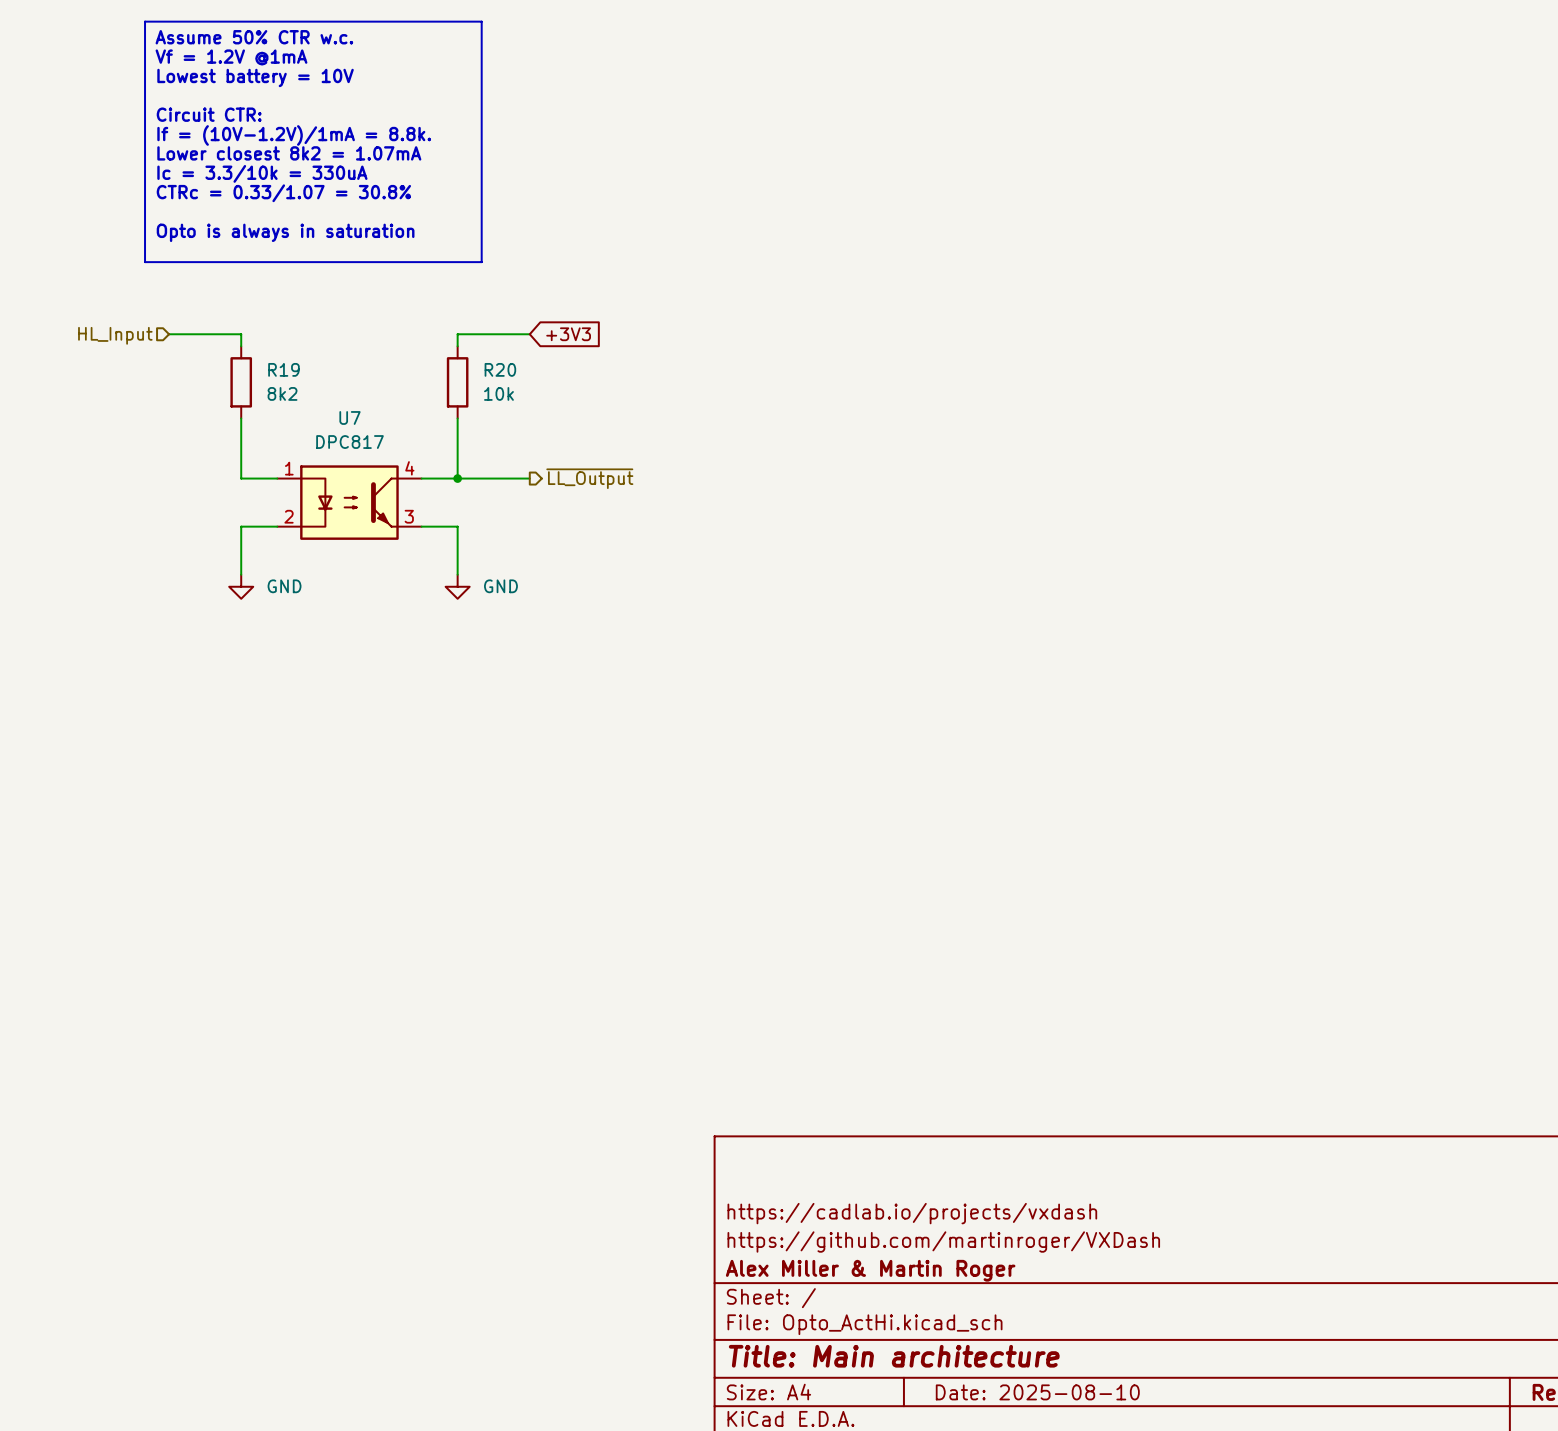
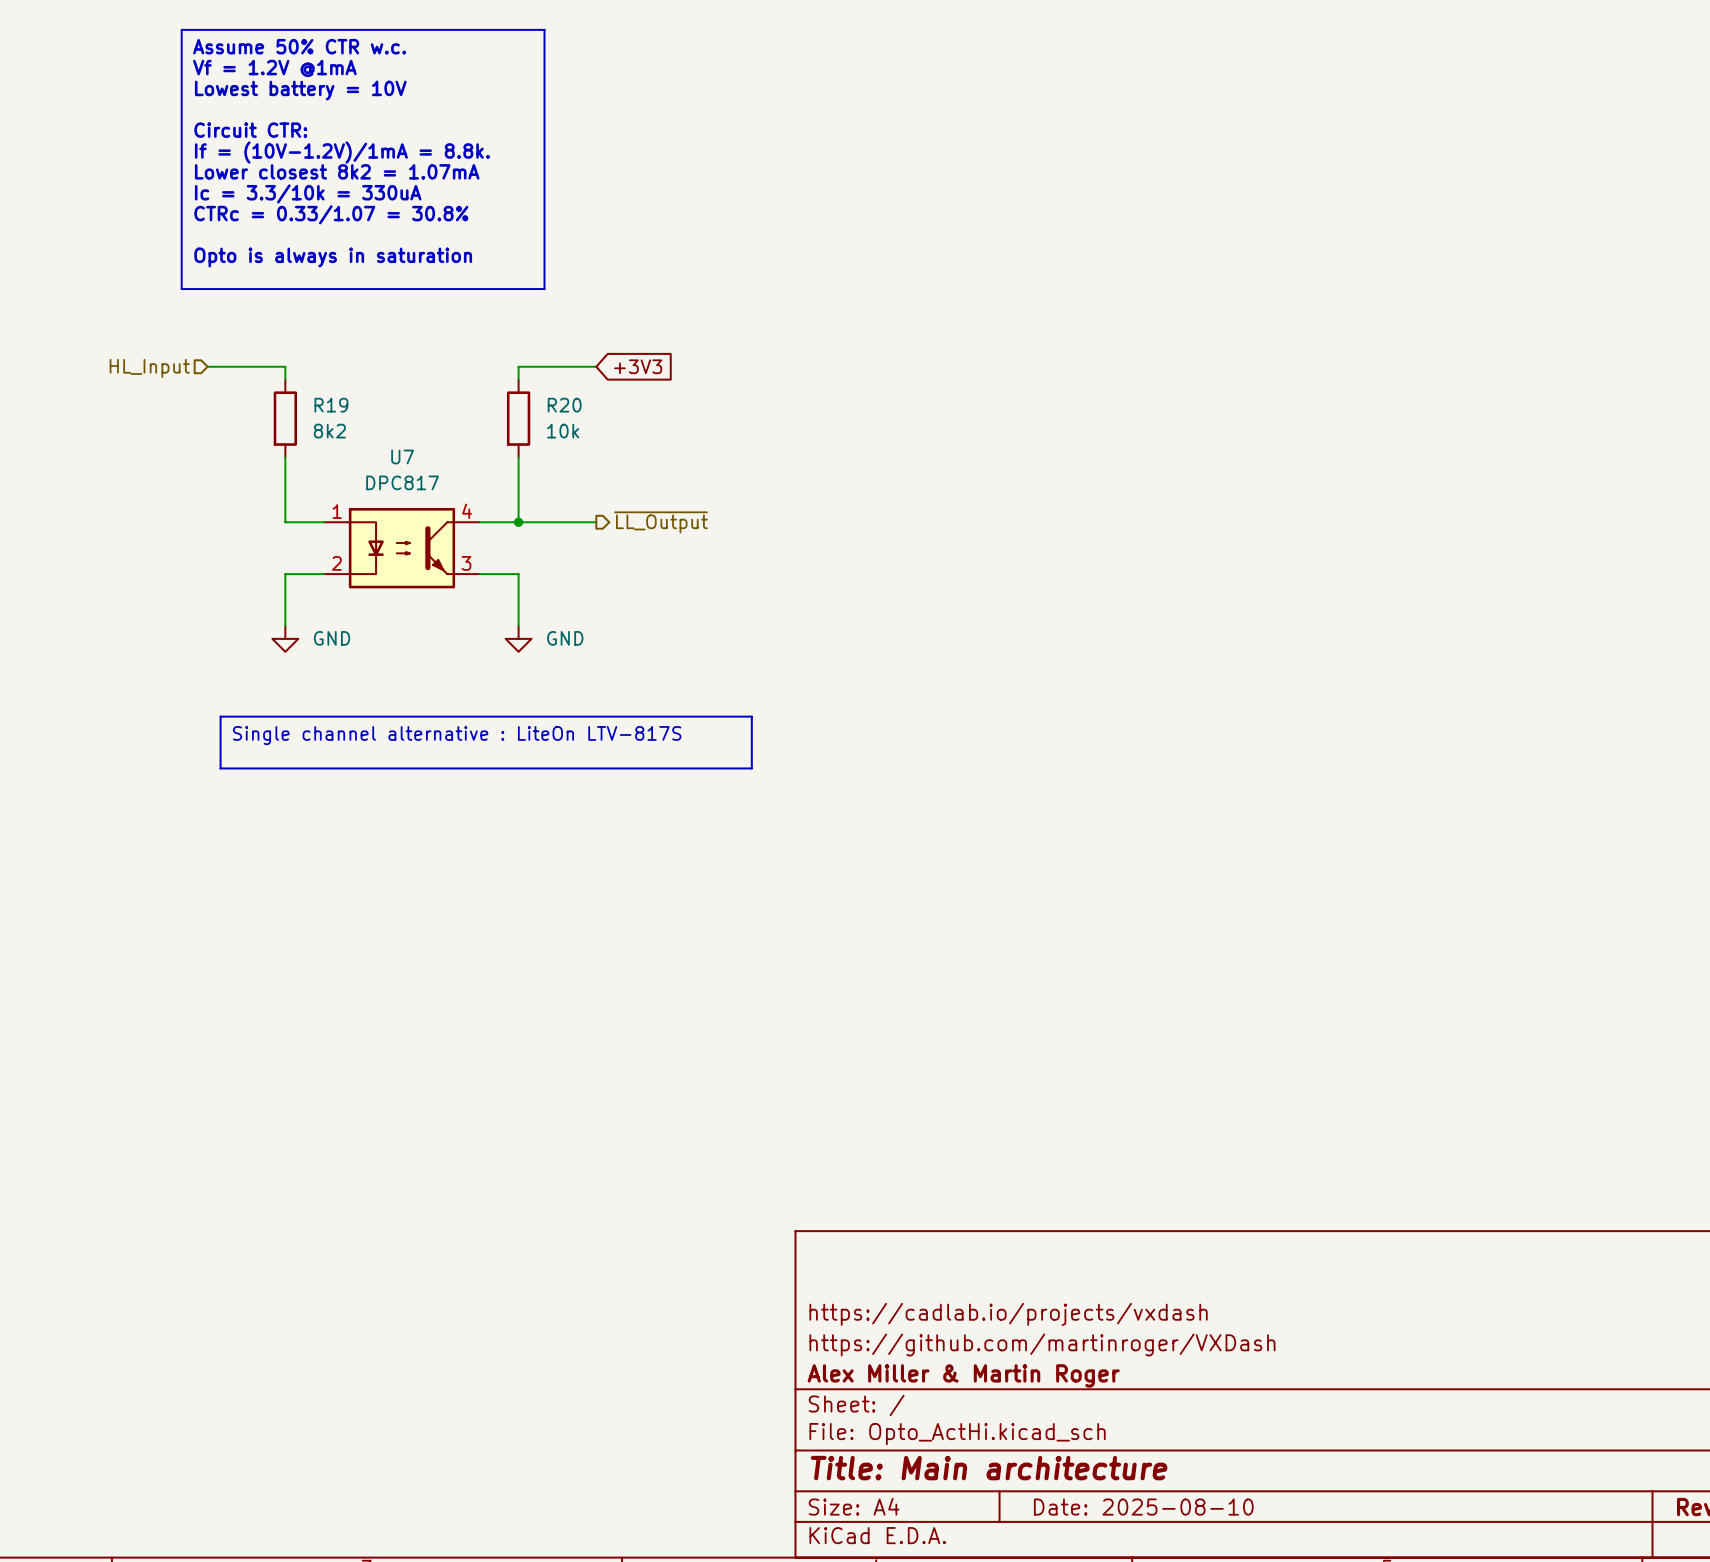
line: none -> (220, 716) (751, 716) (751, 768) (220, 768) (220, 716)
text: none -> Single channel alternative : LiteOn LTV-817S (457, 735)

